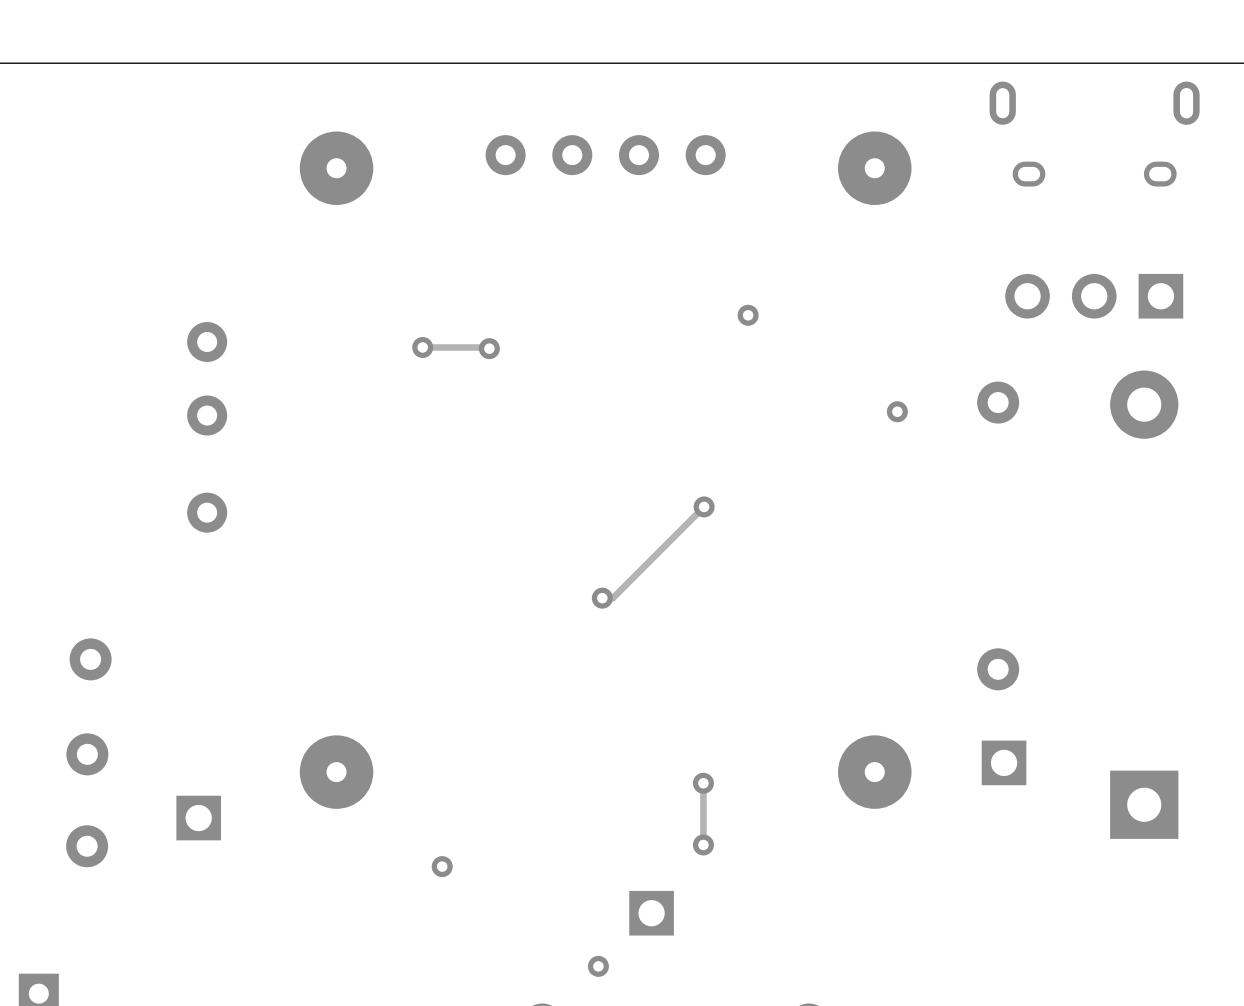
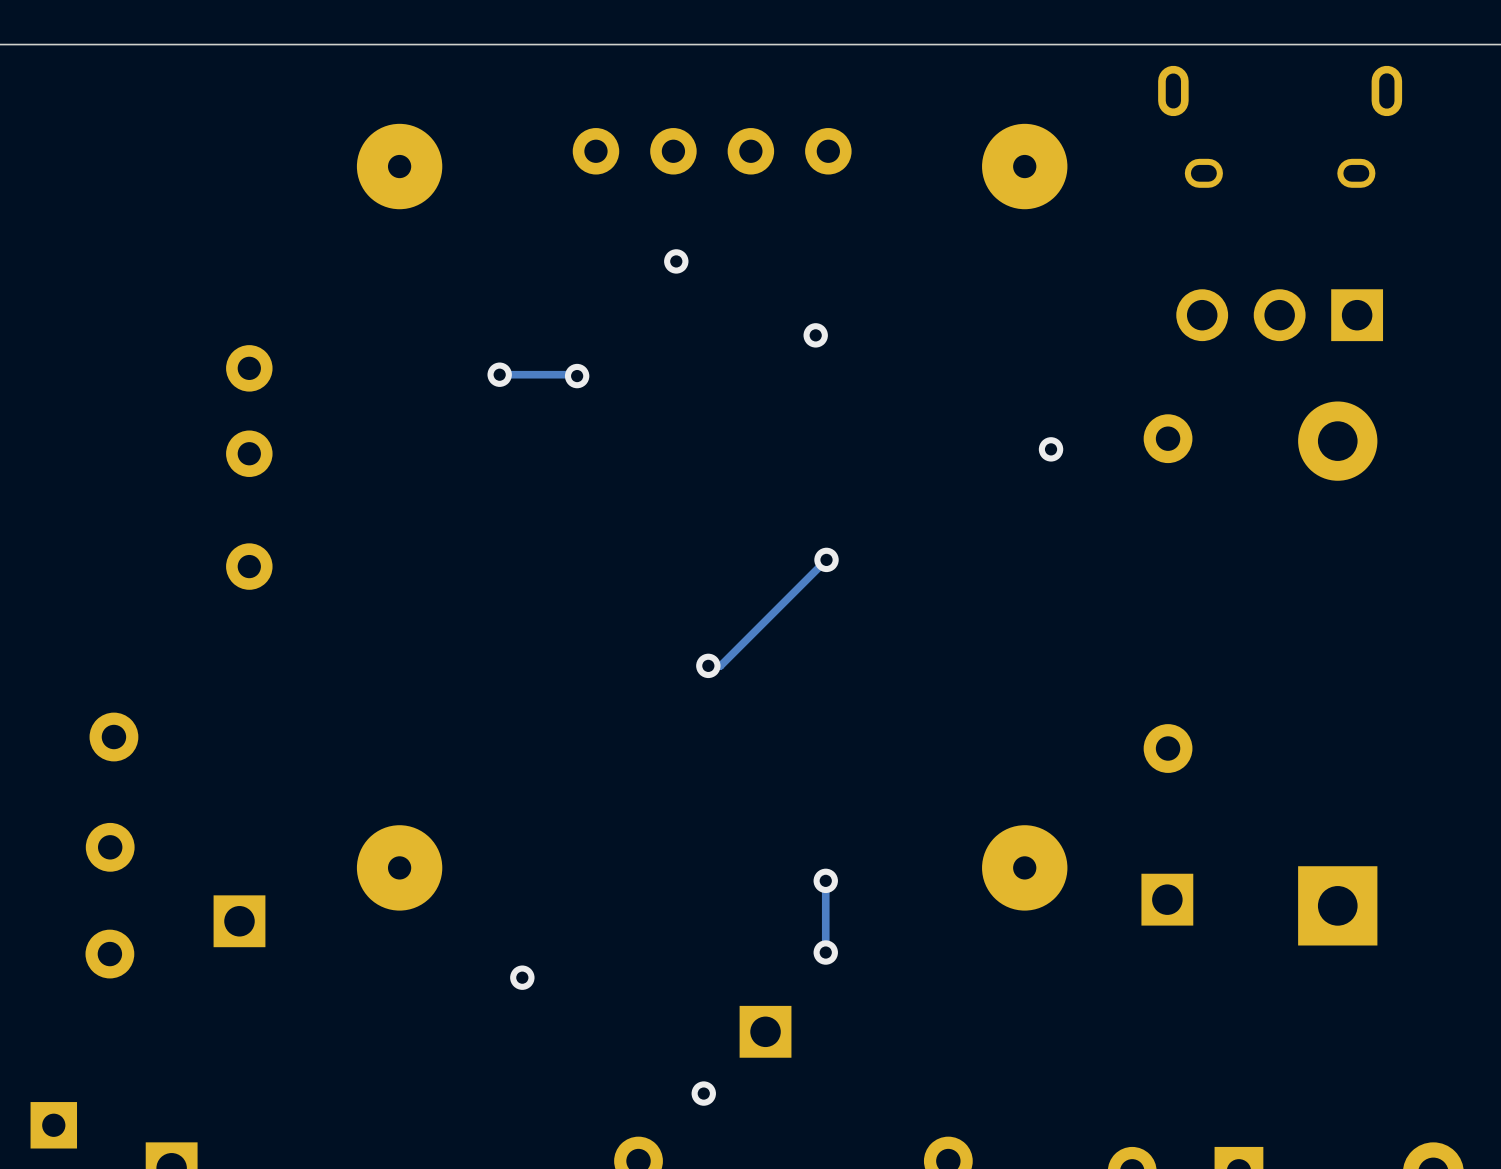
via: none -> (676, 261)
via position: (748, 315) -> (815, 335)
part position: (1004, 762) -> (1167, 899)

